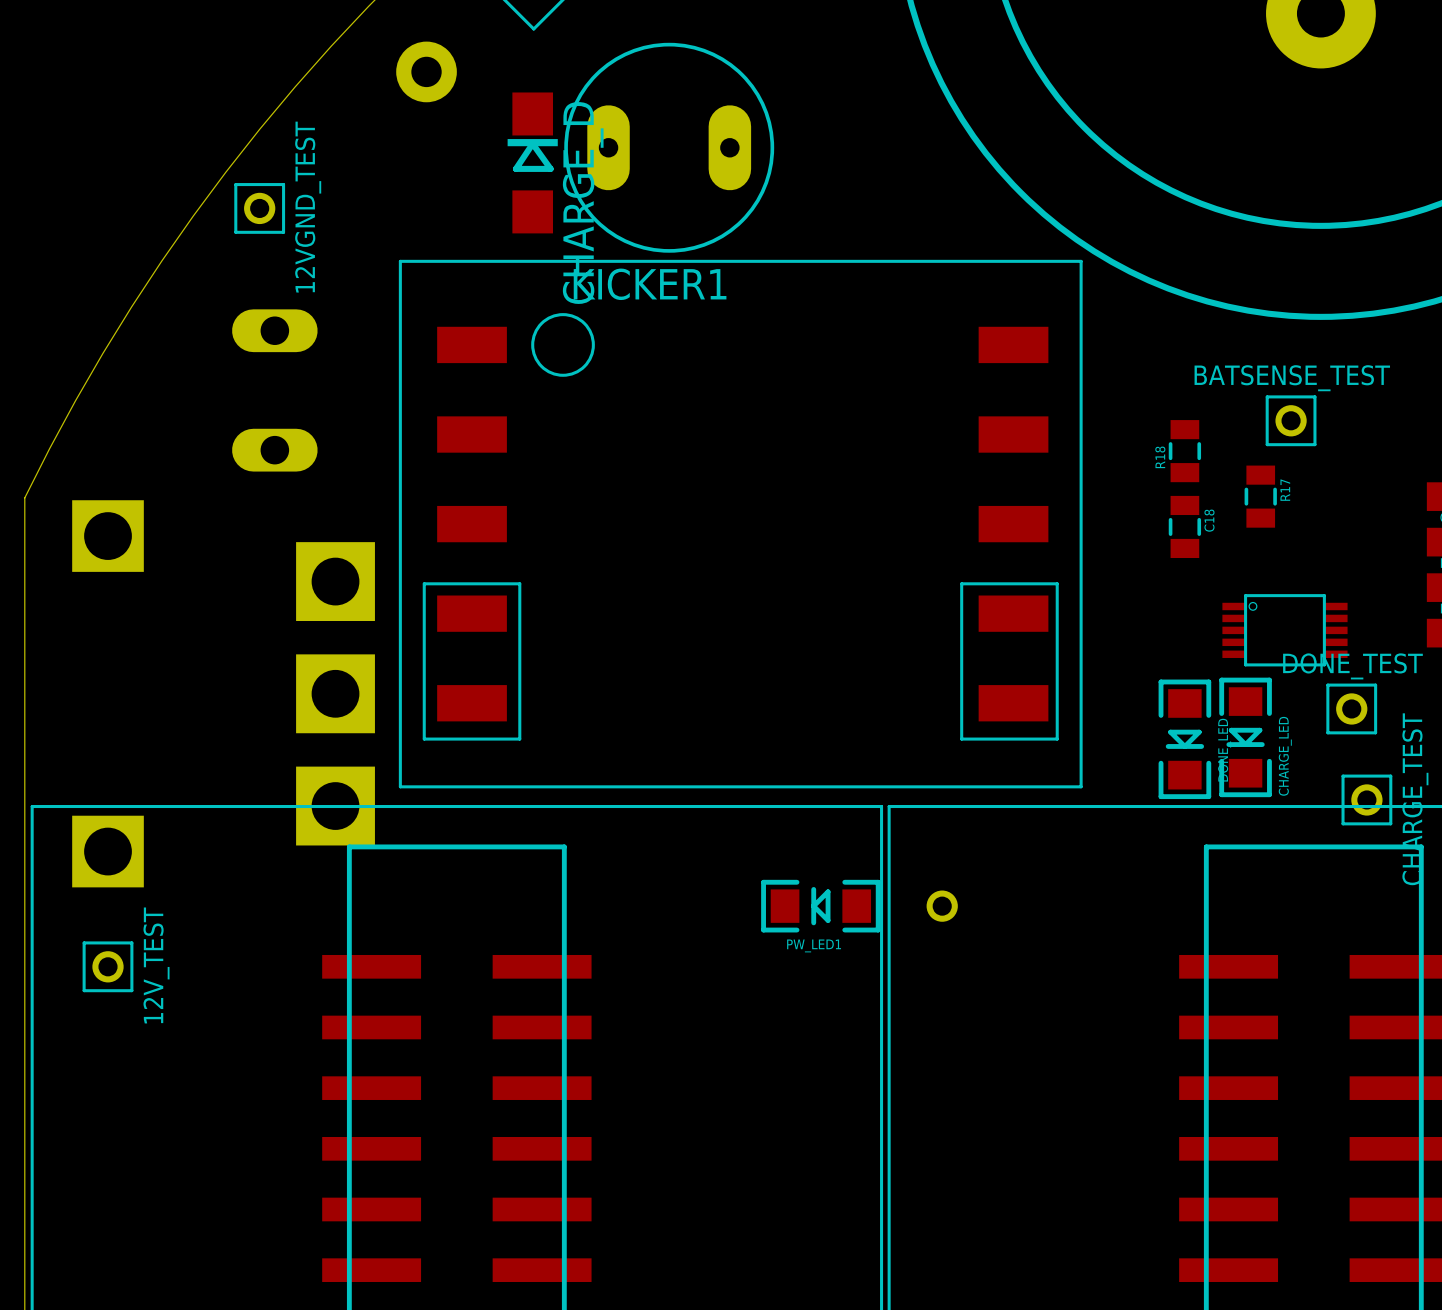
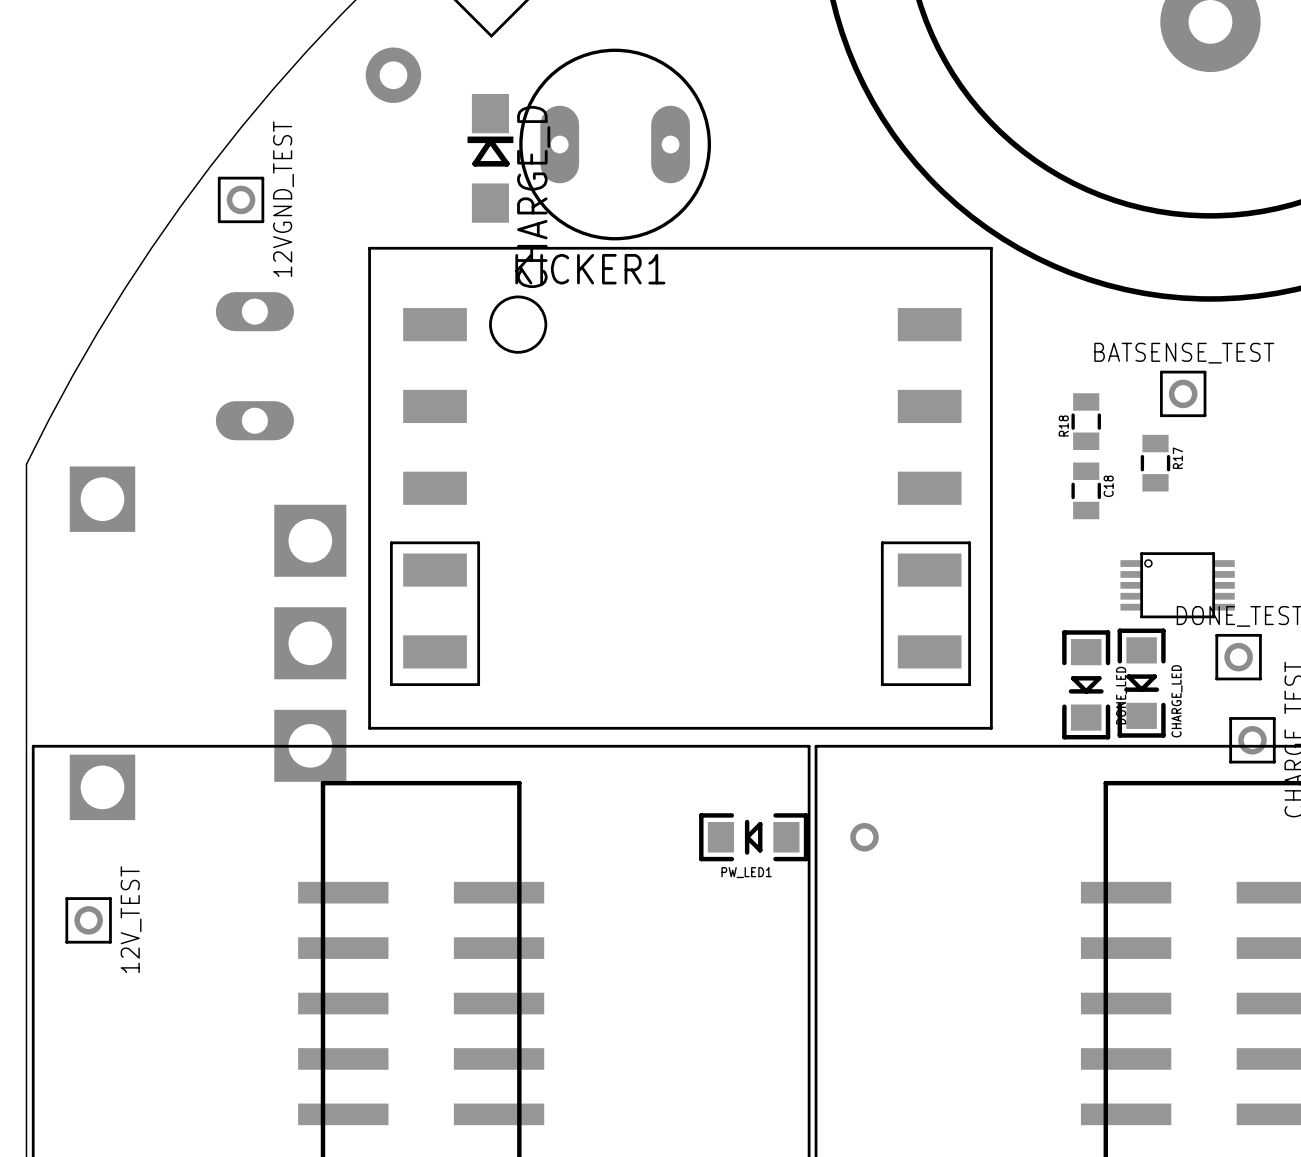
12V_TEST position: (108, 966) -> (88, 920)

